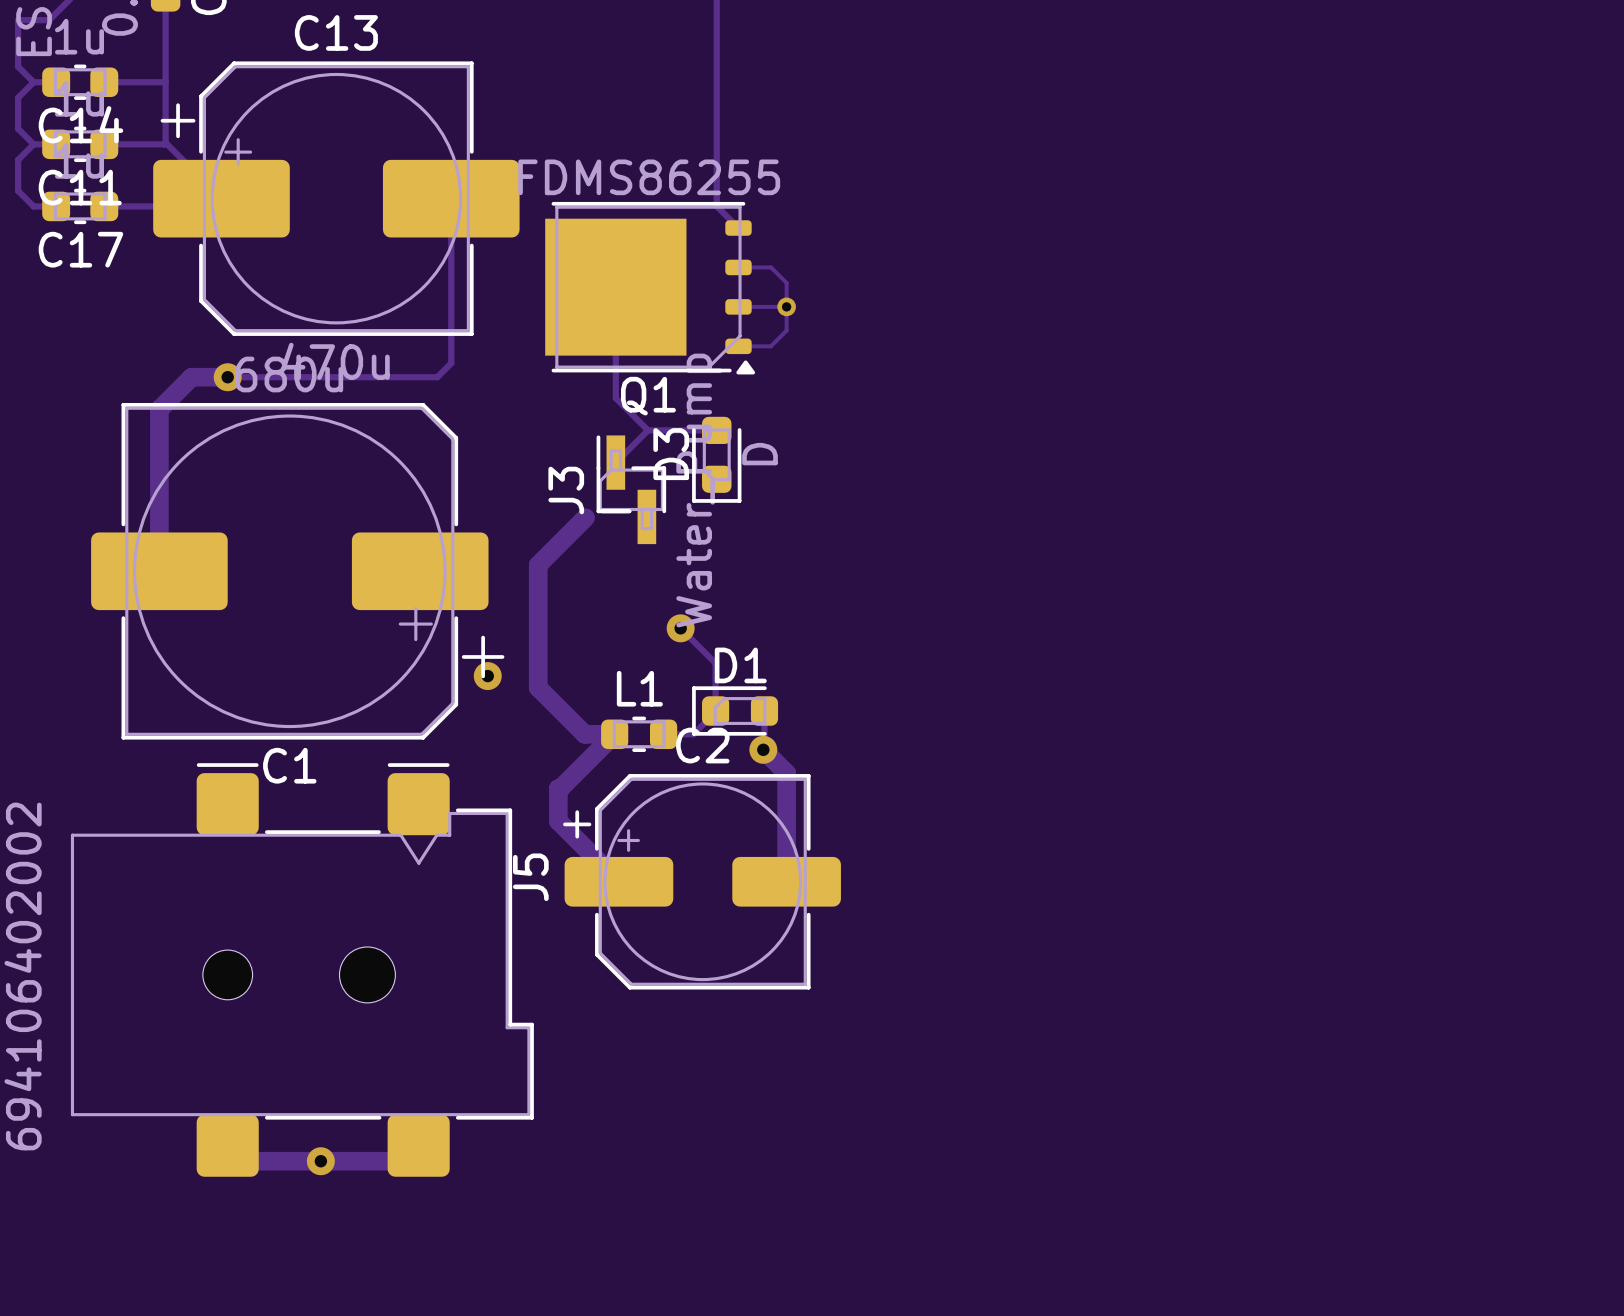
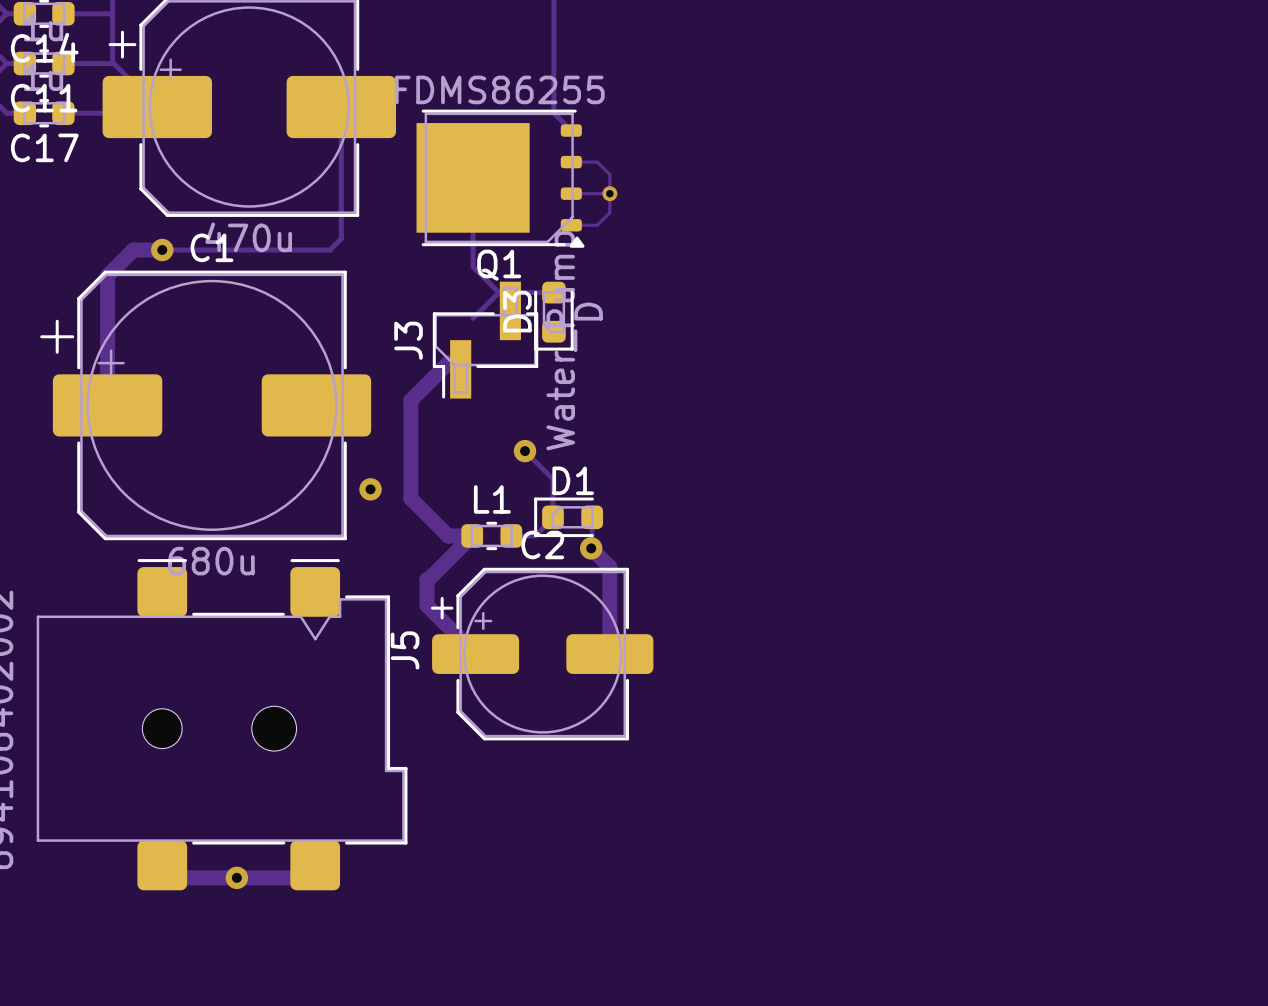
J3 footprint: [596, 435, 667, 545] -> [432, 281, 539, 399]
C1 rotation: 0° (297, 571) -> 180° (205, 405)

